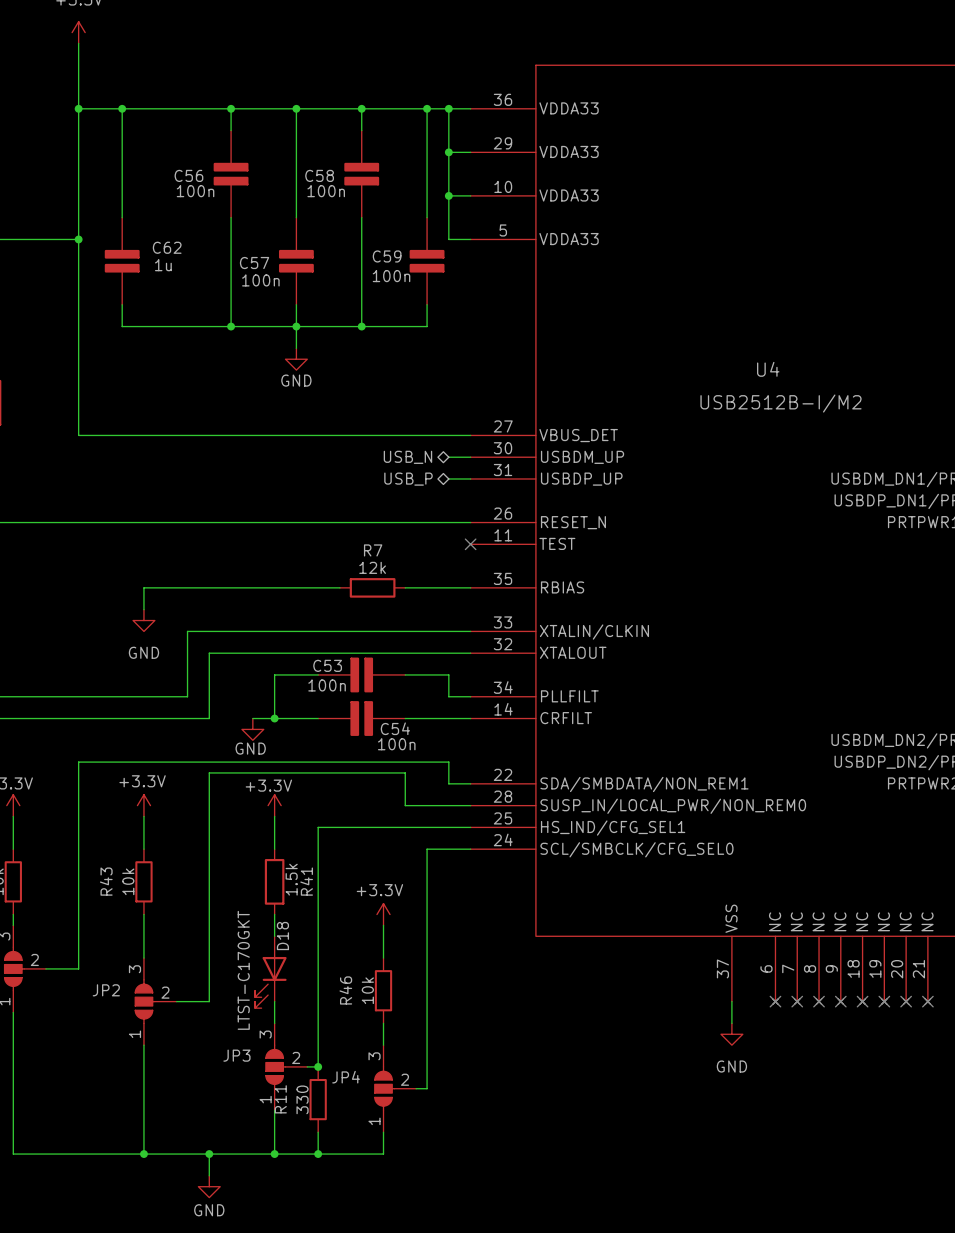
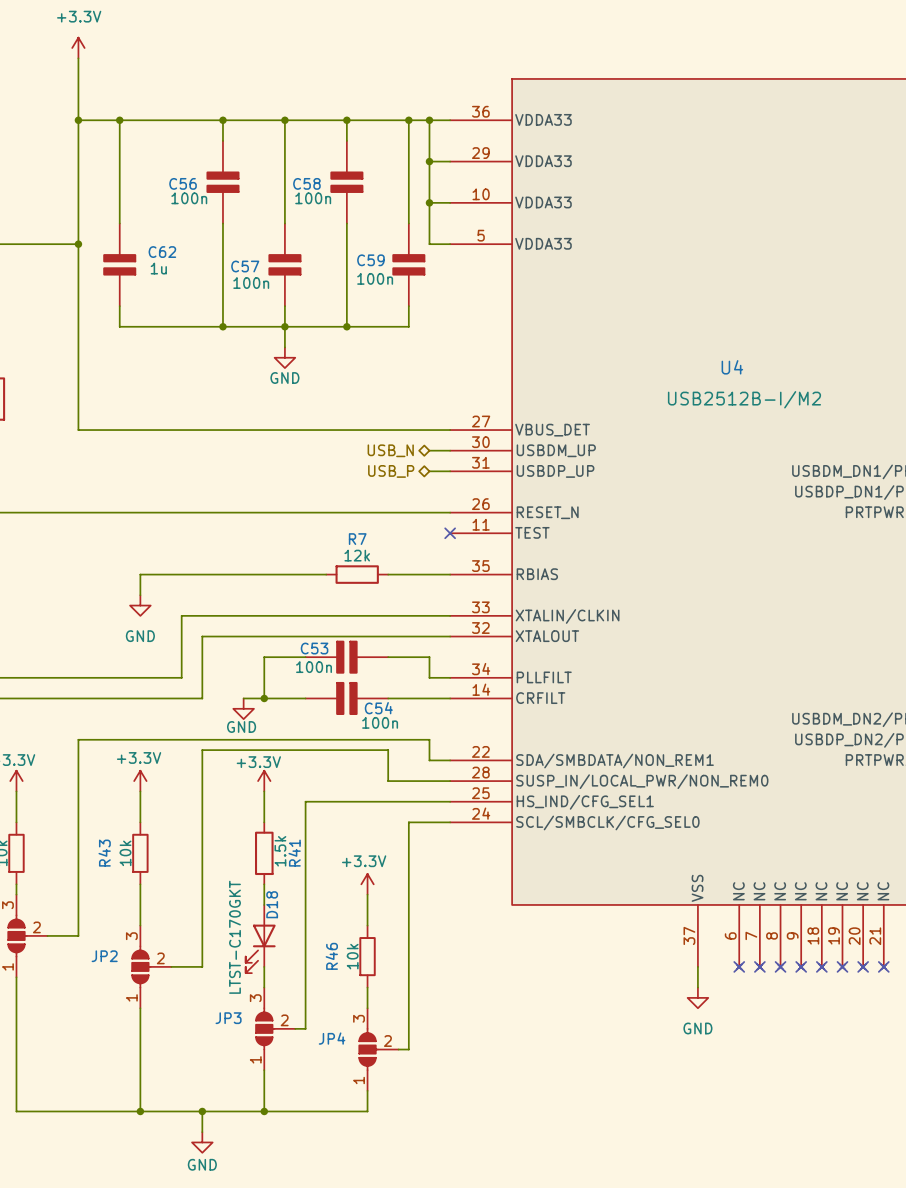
junction: (318, 1066) -> none
R11: 330 (318, 1099) -> none
wire: (318, 1132) (318, 1154) -> none
junction: (318, 1154) -> none

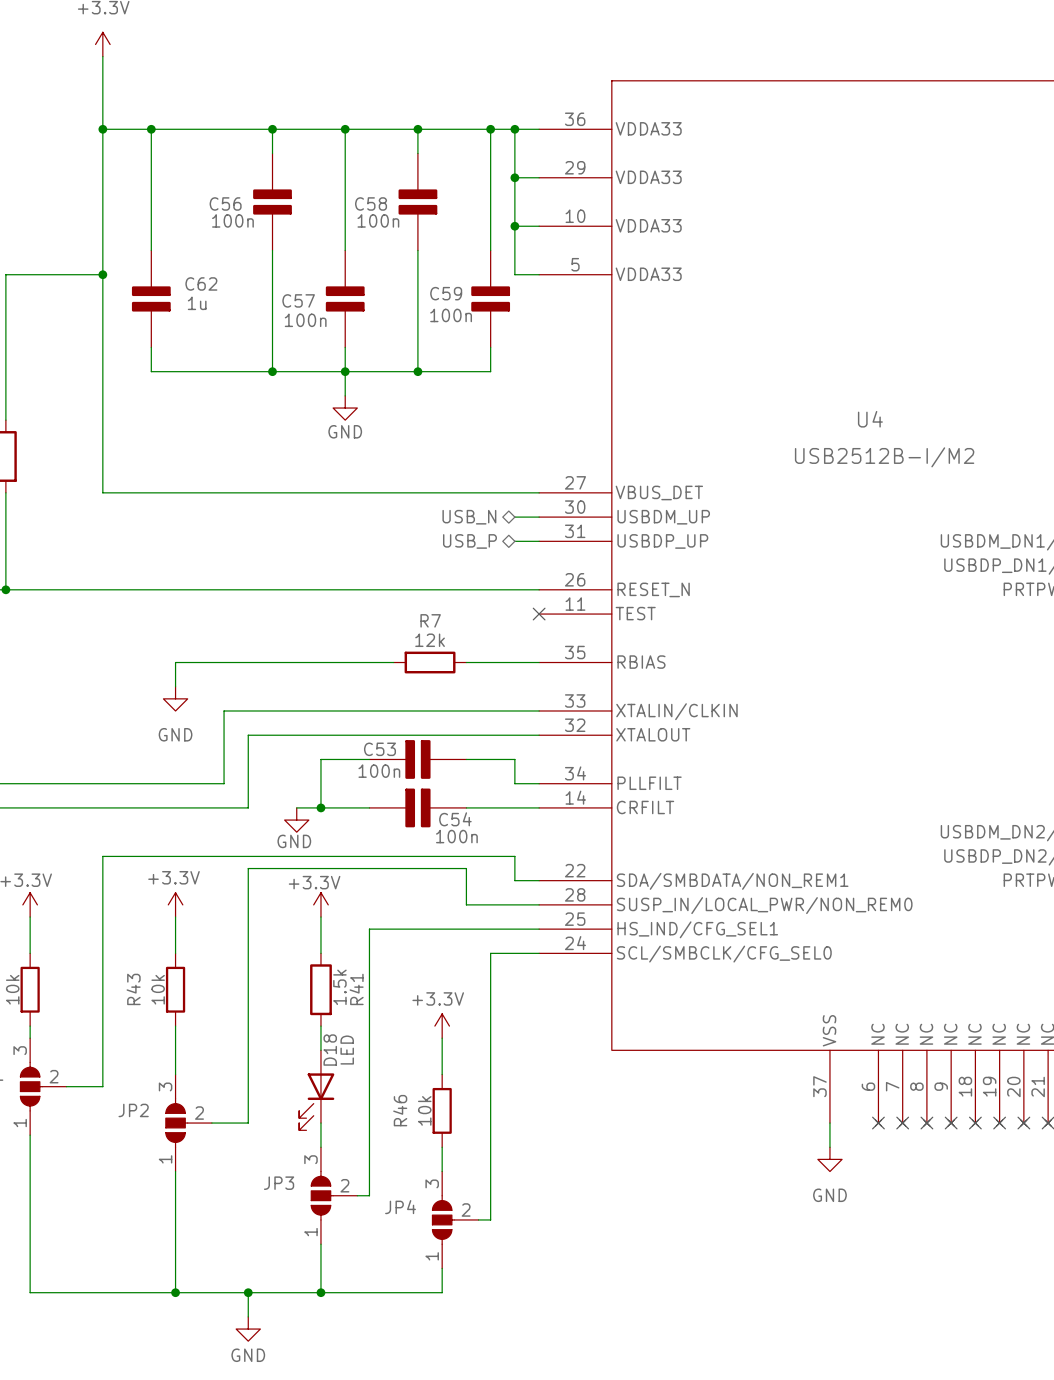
D18 value: LTST-C170GKT (234, 937) -> LED (347, 1050)

